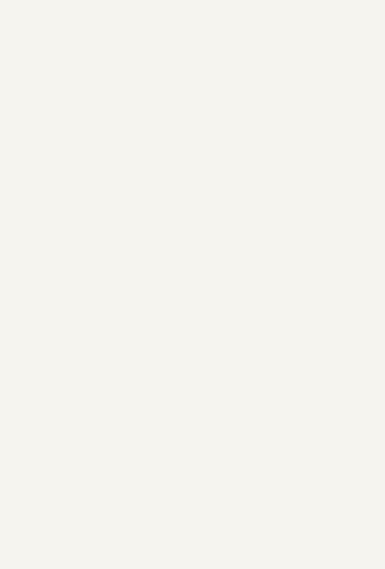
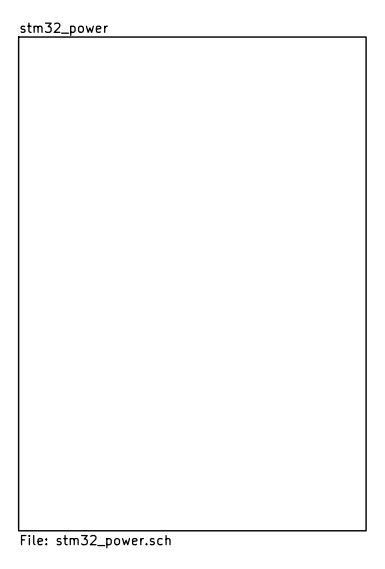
sheet stm32_power: none -> File: stm32_power.sch (192, 283)

